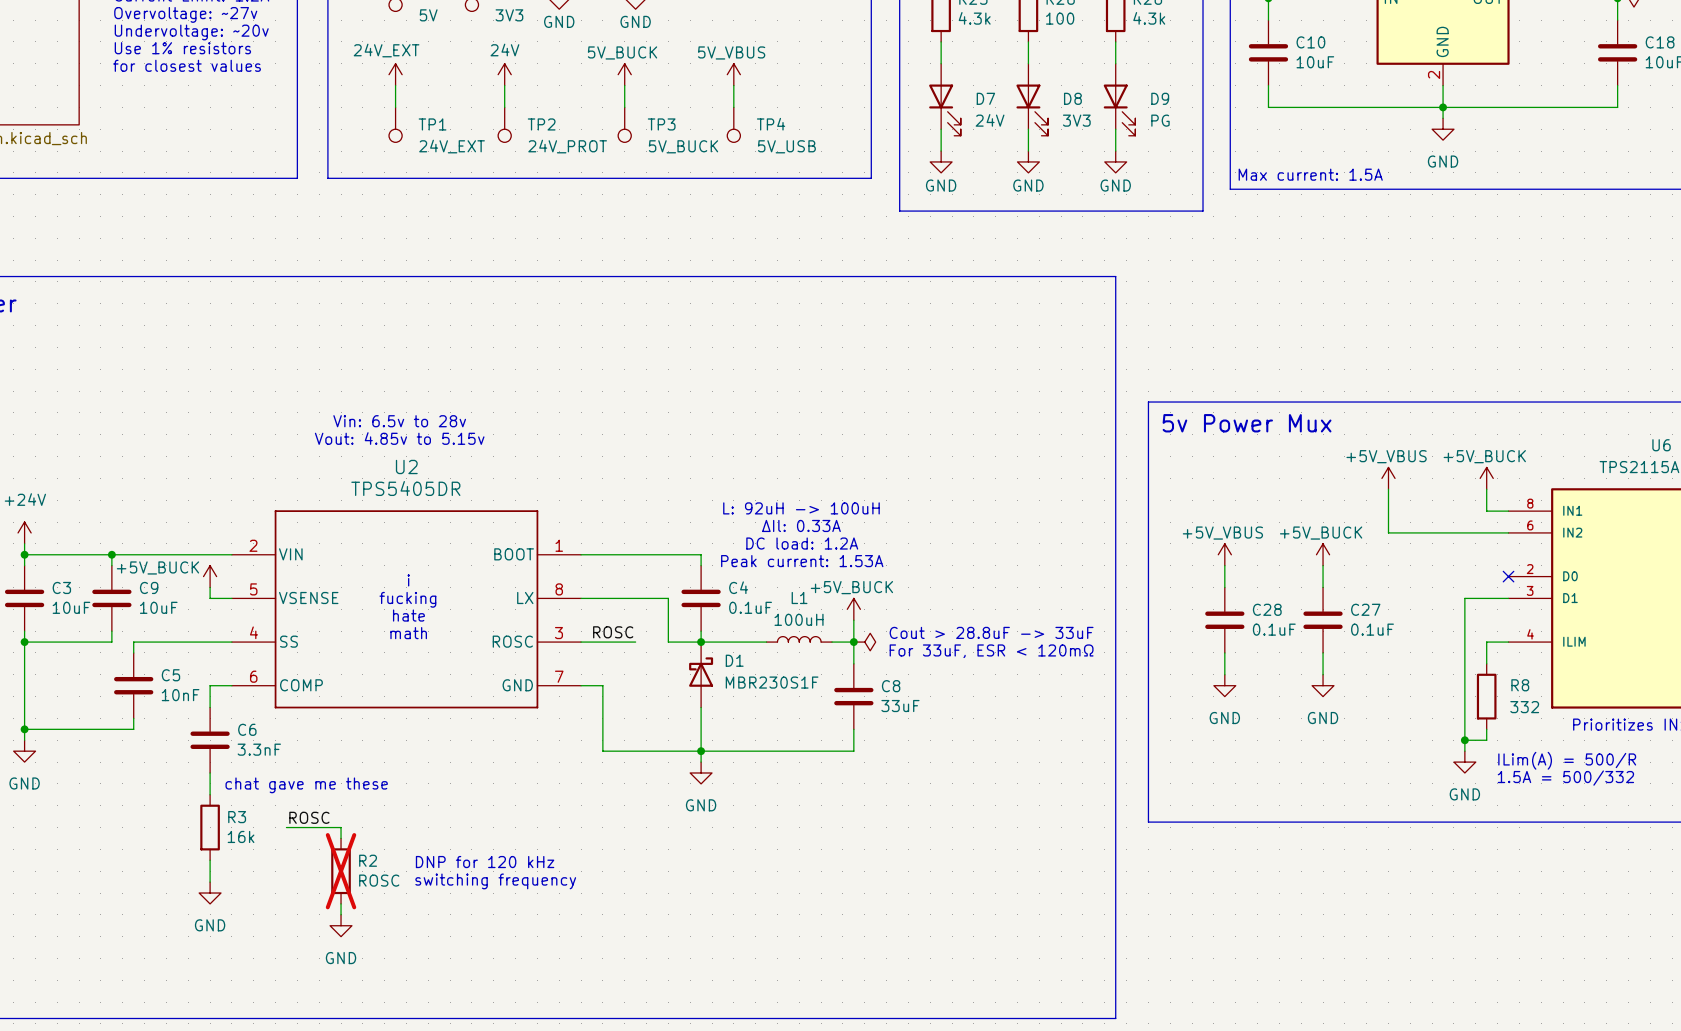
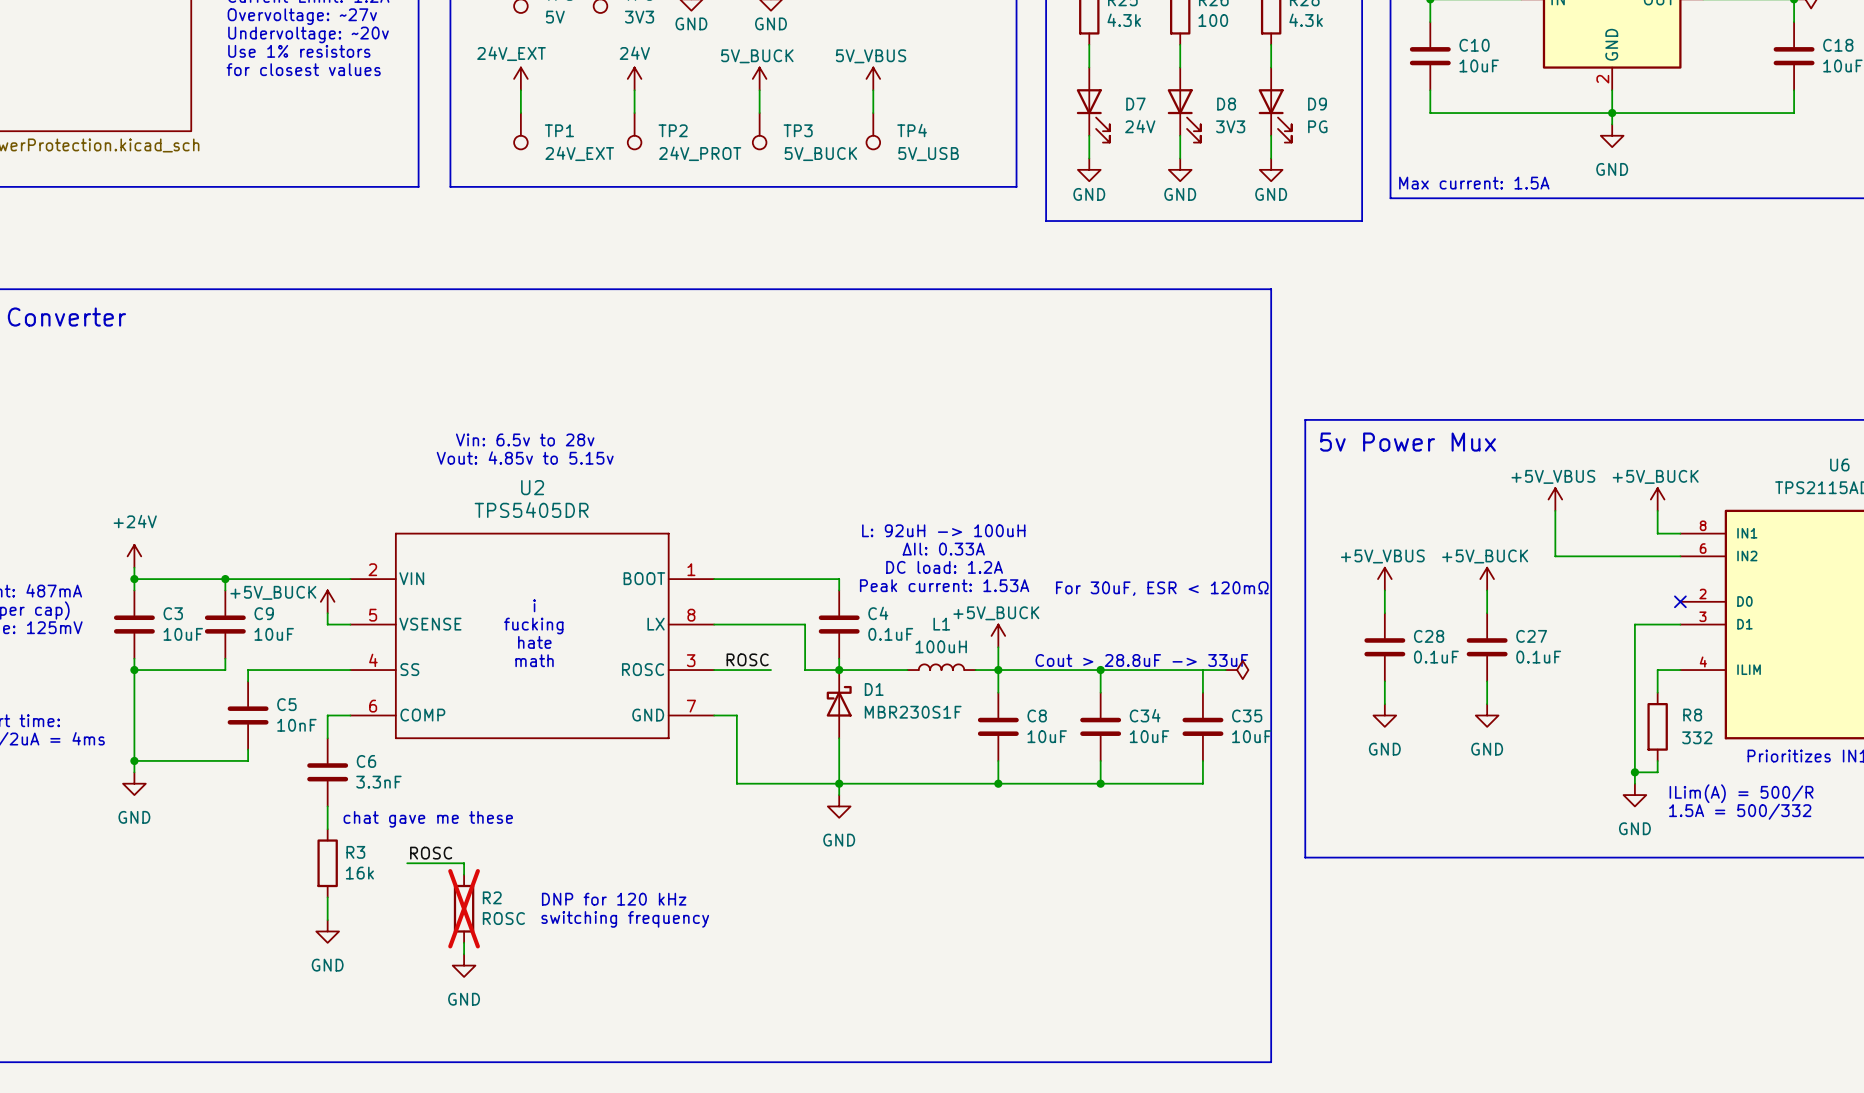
text: none -> For 30uF, ESR < 120mΩ (1162, 588)
wire: none -> (998, 670) (1225, 670)
power symbol: (864, 642) -> none
wire: none -> (1100, 670) (1100, 692)
junction: none -> (1100, 670)
wire: none -> (1202, 670) (1202, 692)
power symbol: none -> (1237, 670)
text: For 33uF, ESR < 120mΩ (991, 651) -> none
C34: none -> 10uF (1100, 726)
C35: none -> 10uF (1202, 726)
C8 value: 33uF (900, 706) -> 10uF (1047, 736)
wire: none -> (1100, 760) (1100, 783)
wire: none -> (1202, 760) (1202, 783) (998, 783)
junction: none -> (998, 783)
junction: none -> (1100, 783)

